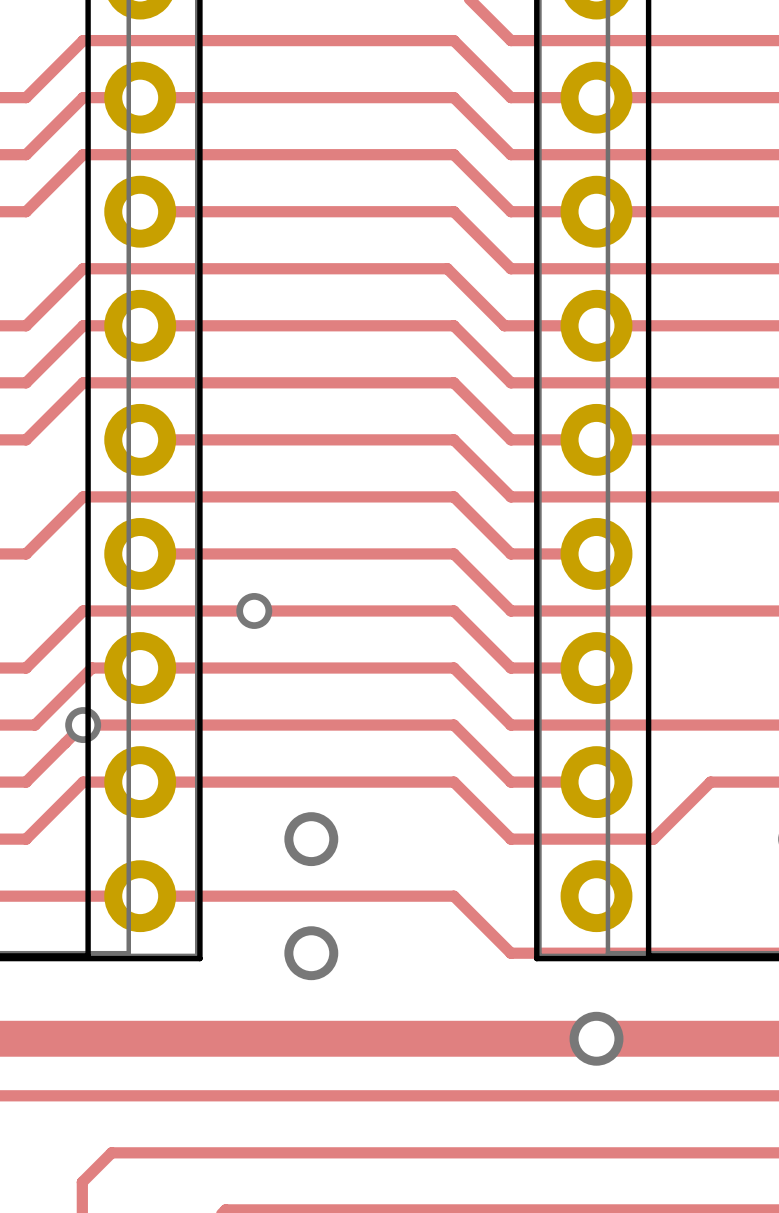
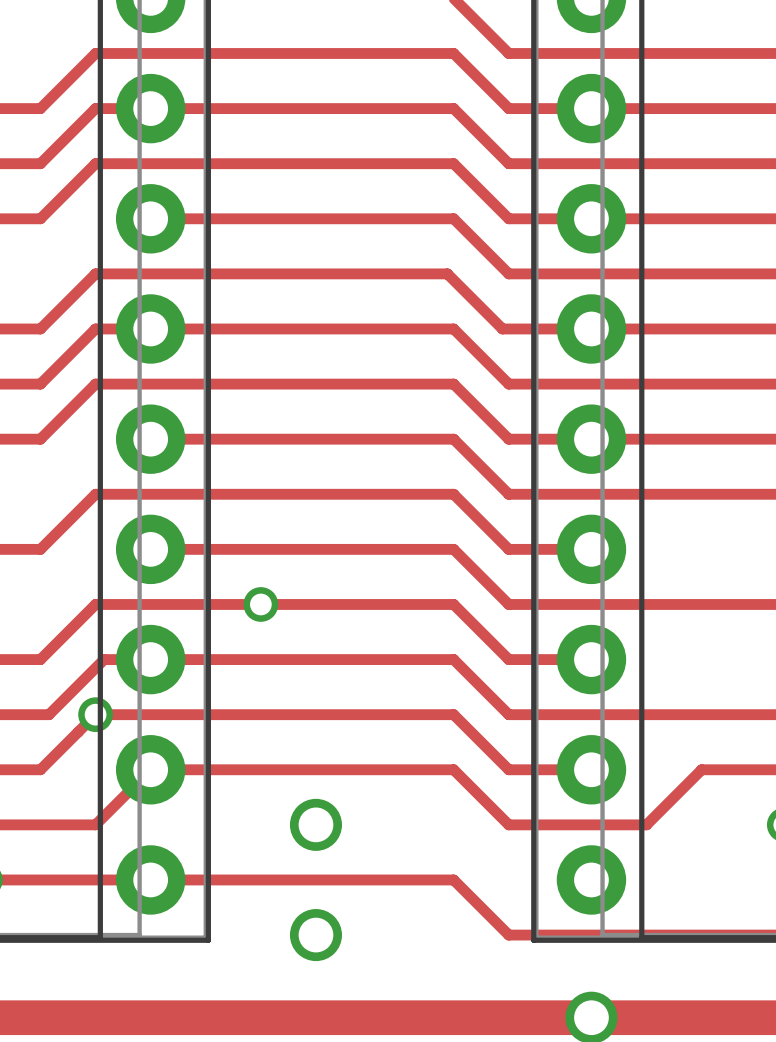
track: (140, 782) (83, 782) (26, 839) -> (150, 769) (95, 824) (40, 824)

